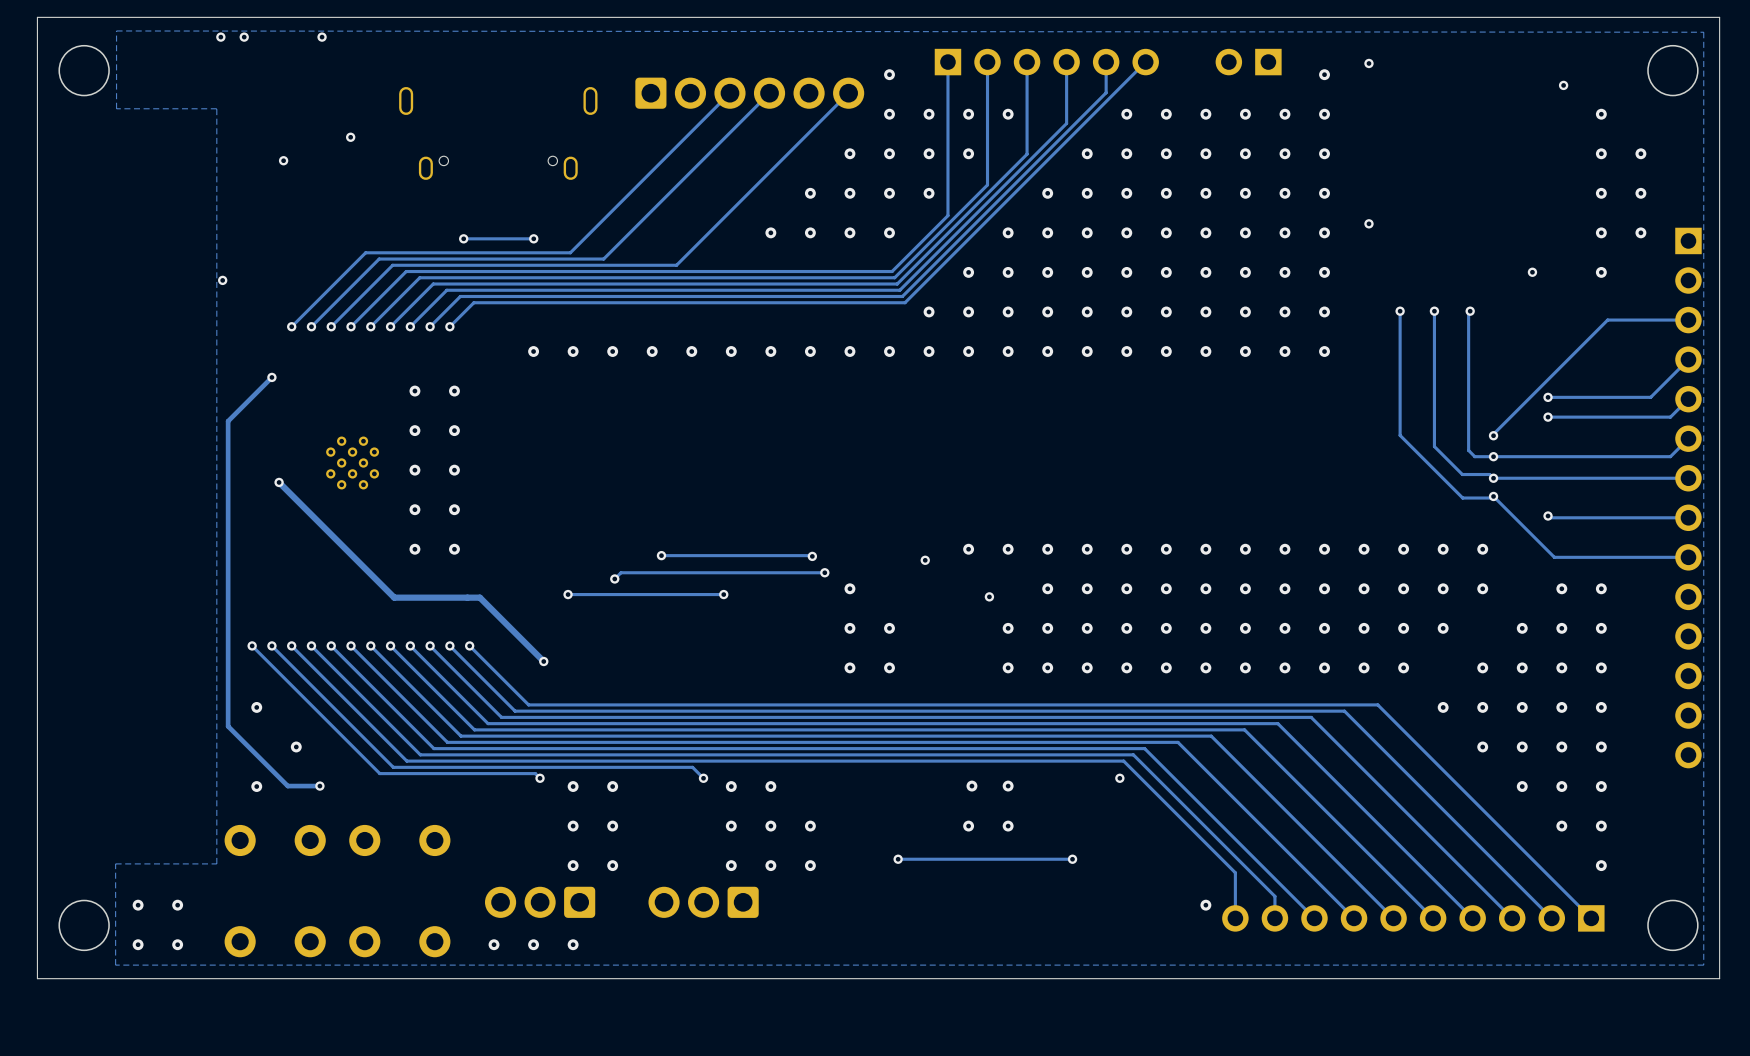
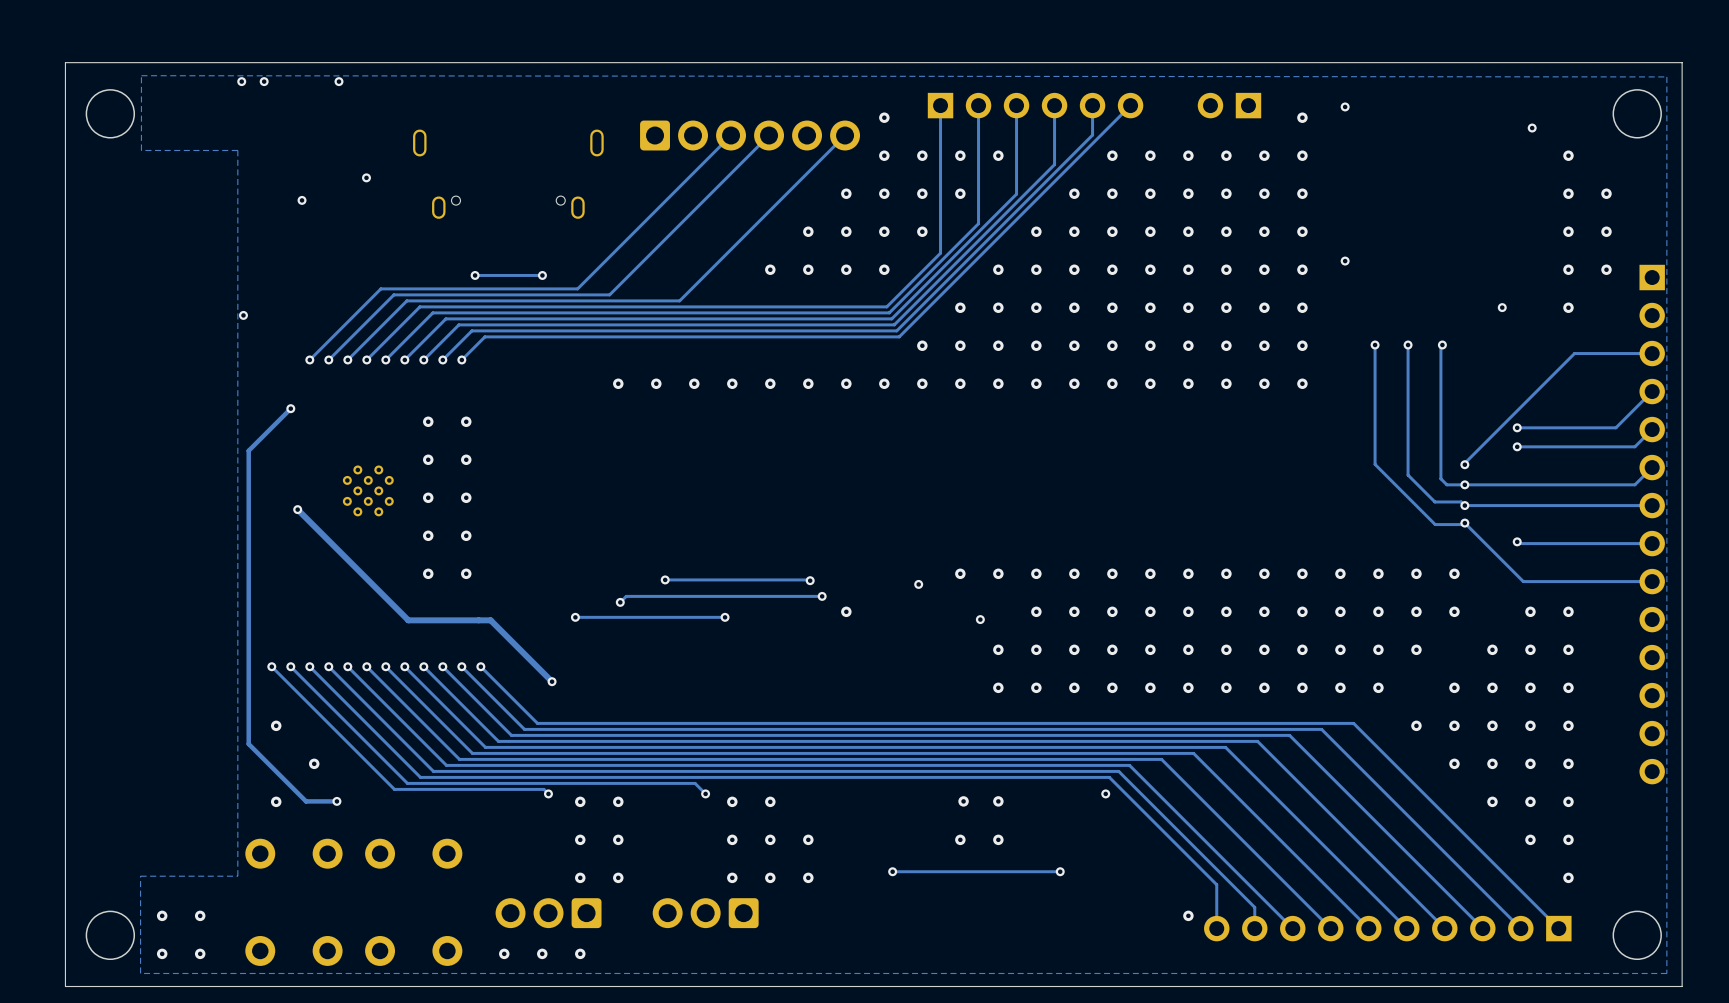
via: (533, 351) -> none
via: (573, 351) -> none
via: (849, 628) -> none
via: (889, 628) -> none
via: (849, 667) -> none
via: (889, 667) -> none

